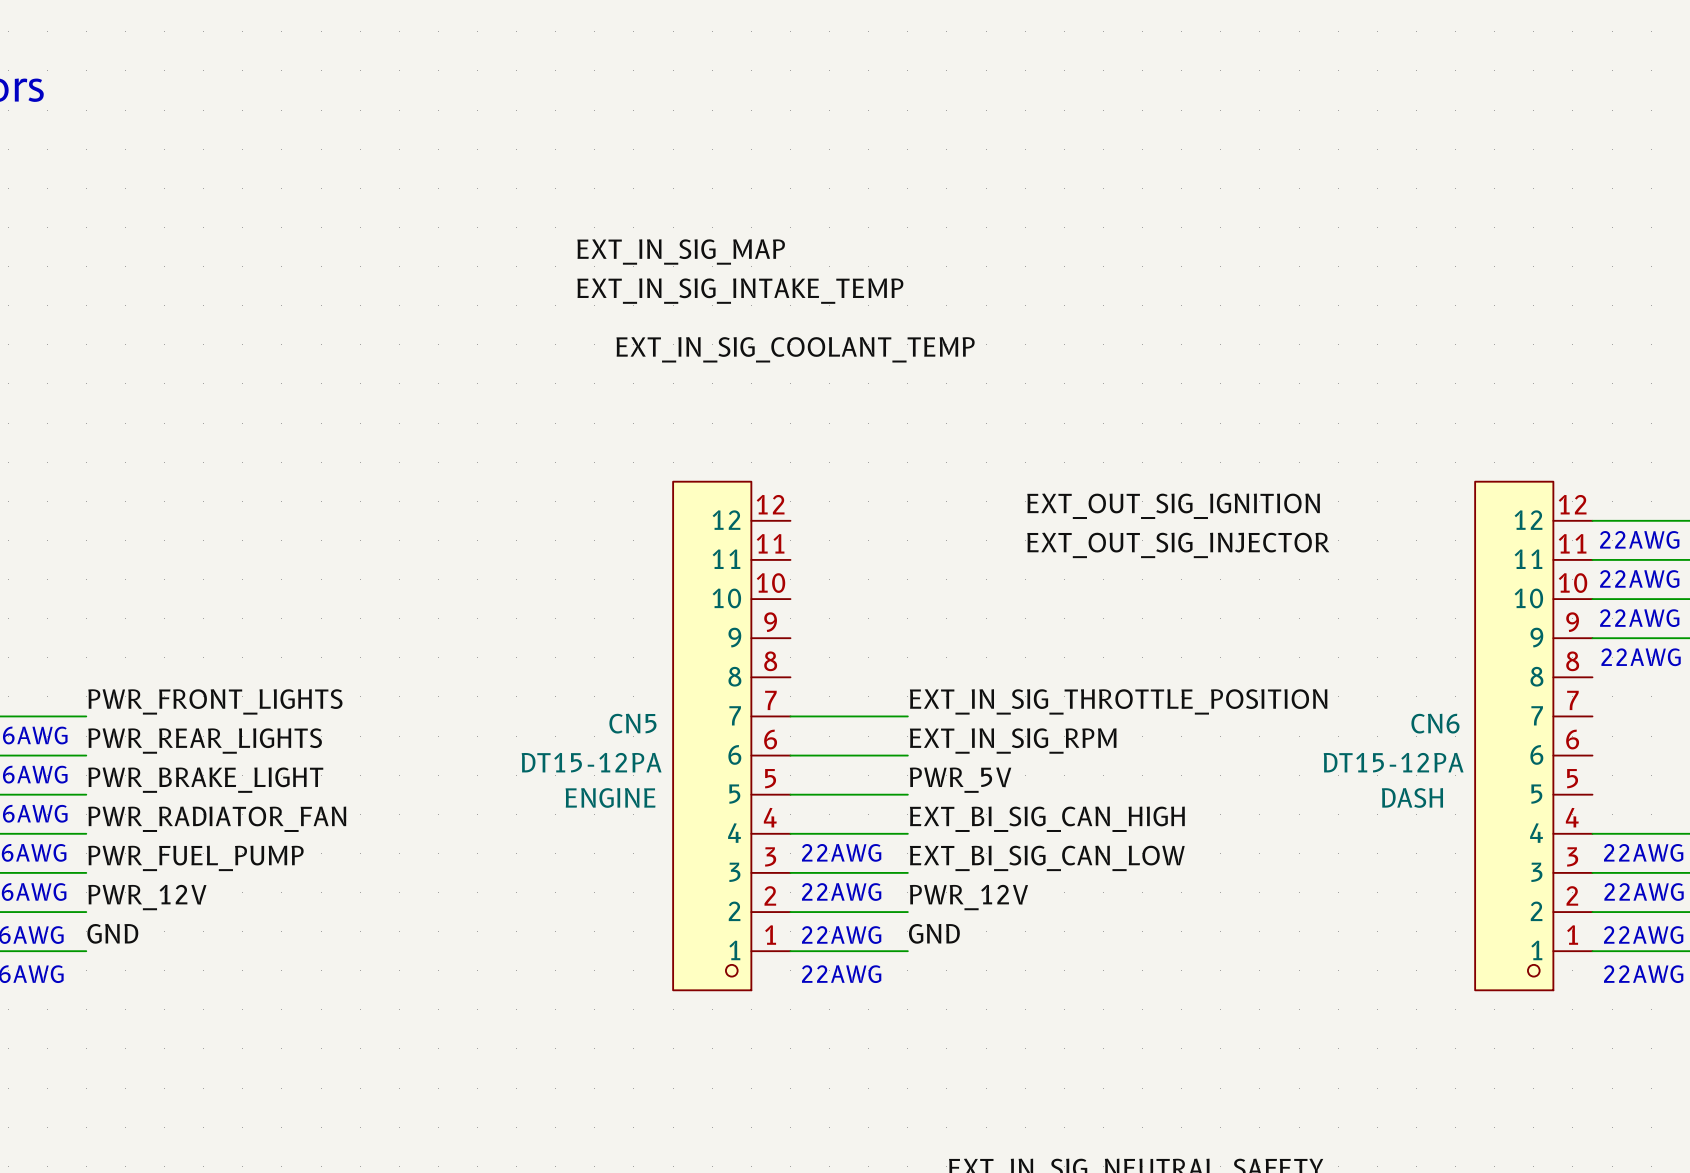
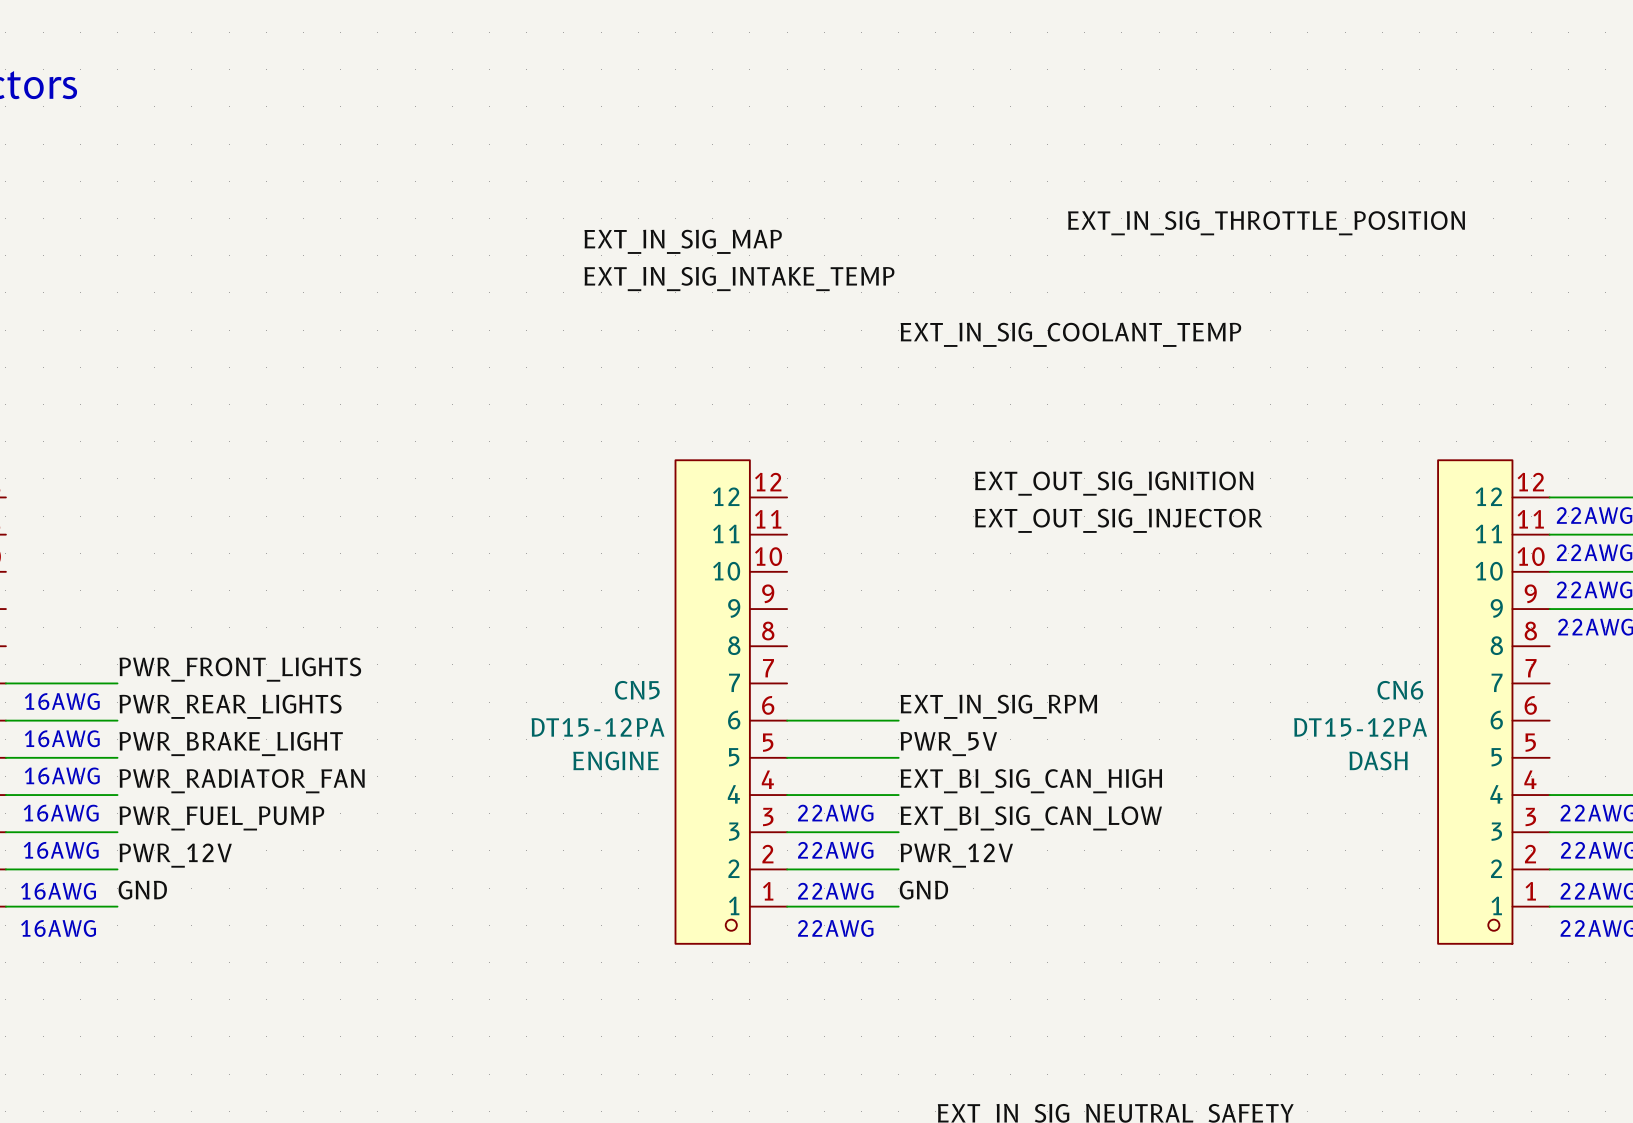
label: none -> EXT_IN_SIG_THROTTLE_POSITION (1266, 223)
label position: EXT_IN_SIG_COOLANT_TEMP (795, 349) -> EXT_IN_SIG_COOLANT_TEMP (1070, 334)
label position: EXT_OUT_SIG_IGNITION (1173, 506) -> EXT_OUT_SIG_IGNITION (1114, 483)
label position: EXT_OUT_SIG_INJECTOR (1178, 545) -> EXT_OUT_SIG_INJECTOR (1118, 520)
label: EXT_IN_SIG_THROTTLE_POSITION (1118, 701) -> none
wire: (790, 716) (907, 716) -> none

